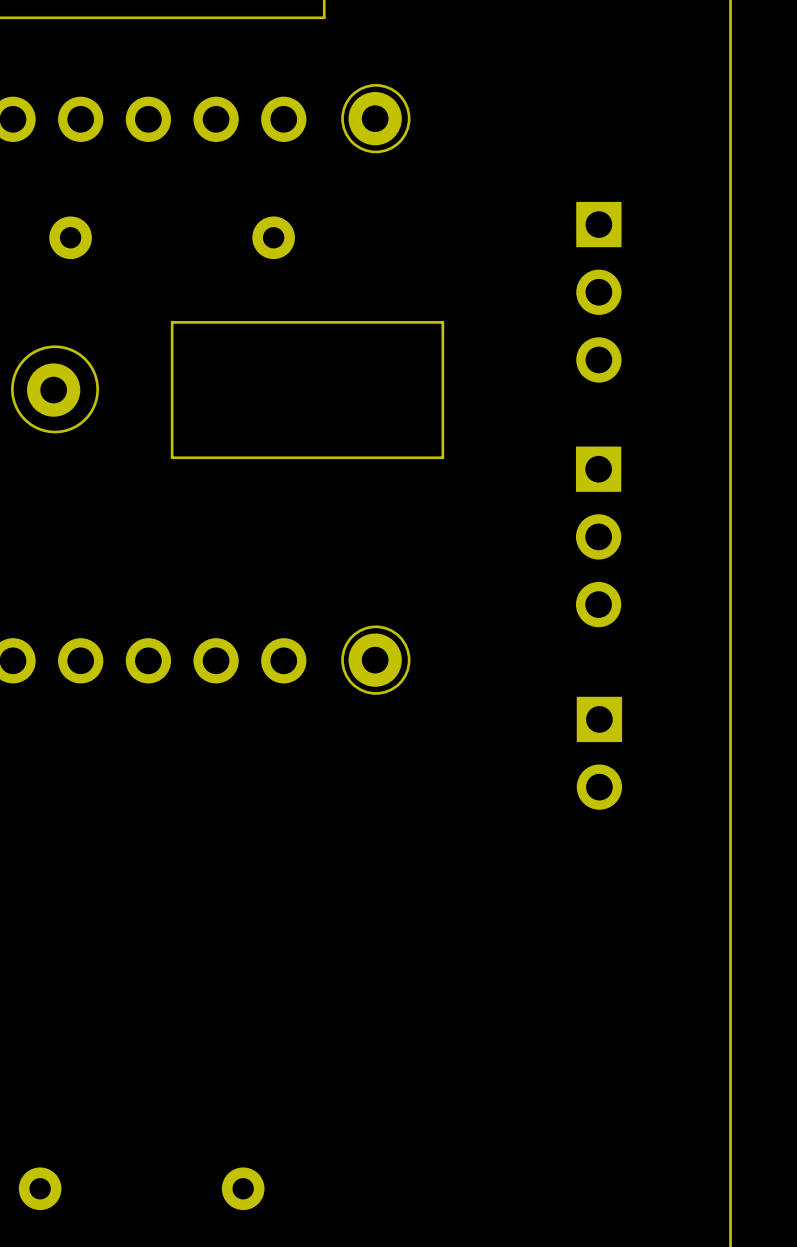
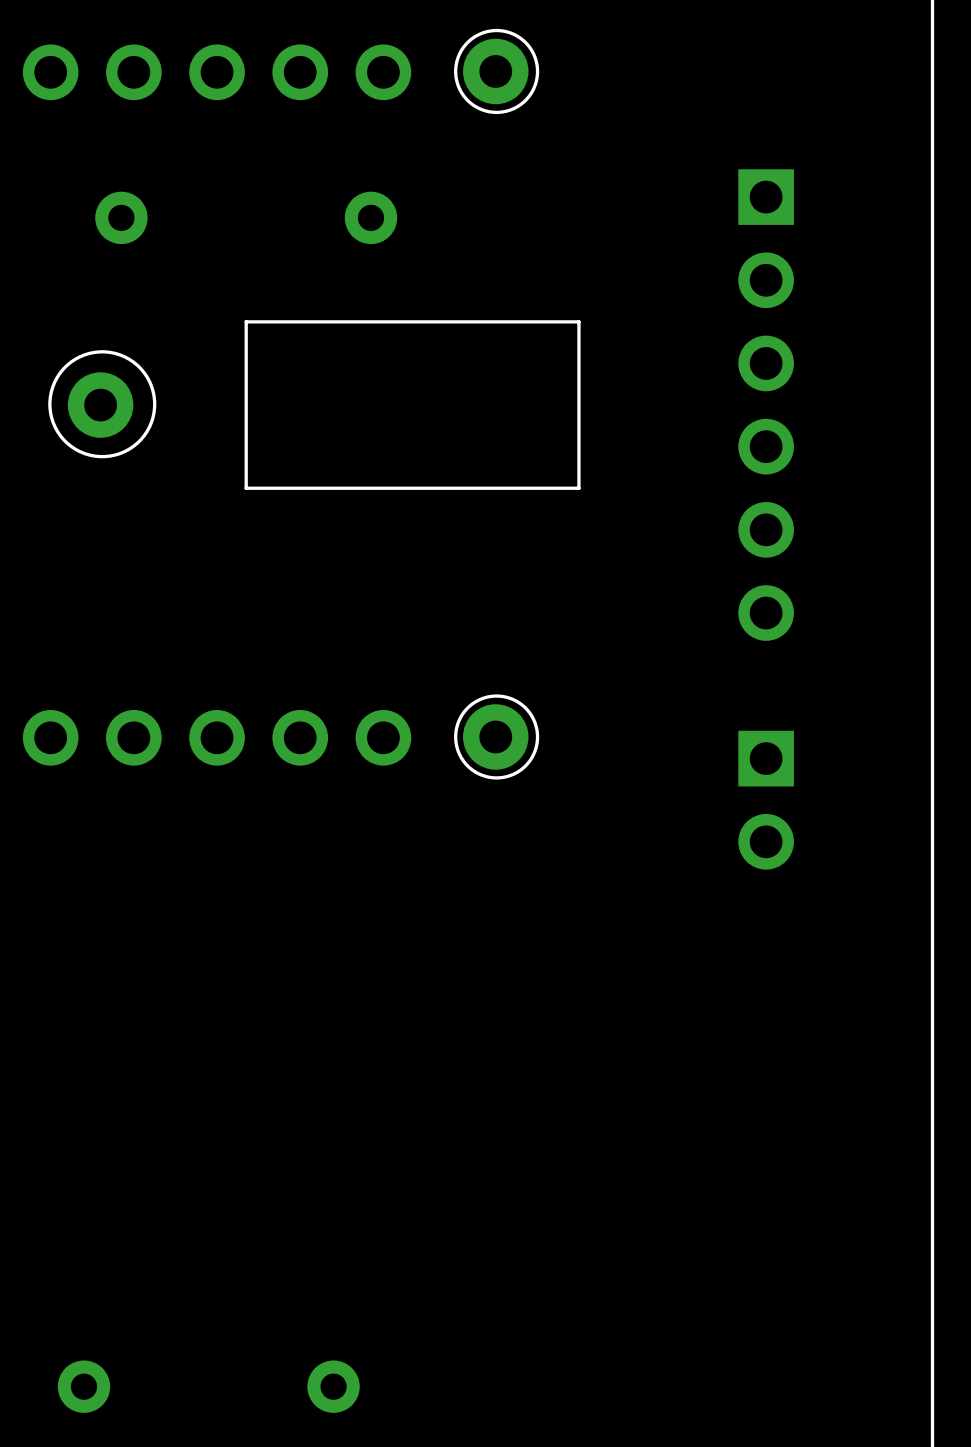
part: (598, 292) -> none
part: none -> (766, 405)
part: (598, 536) -> none
part position: (599, 753) -> (766, 800)

